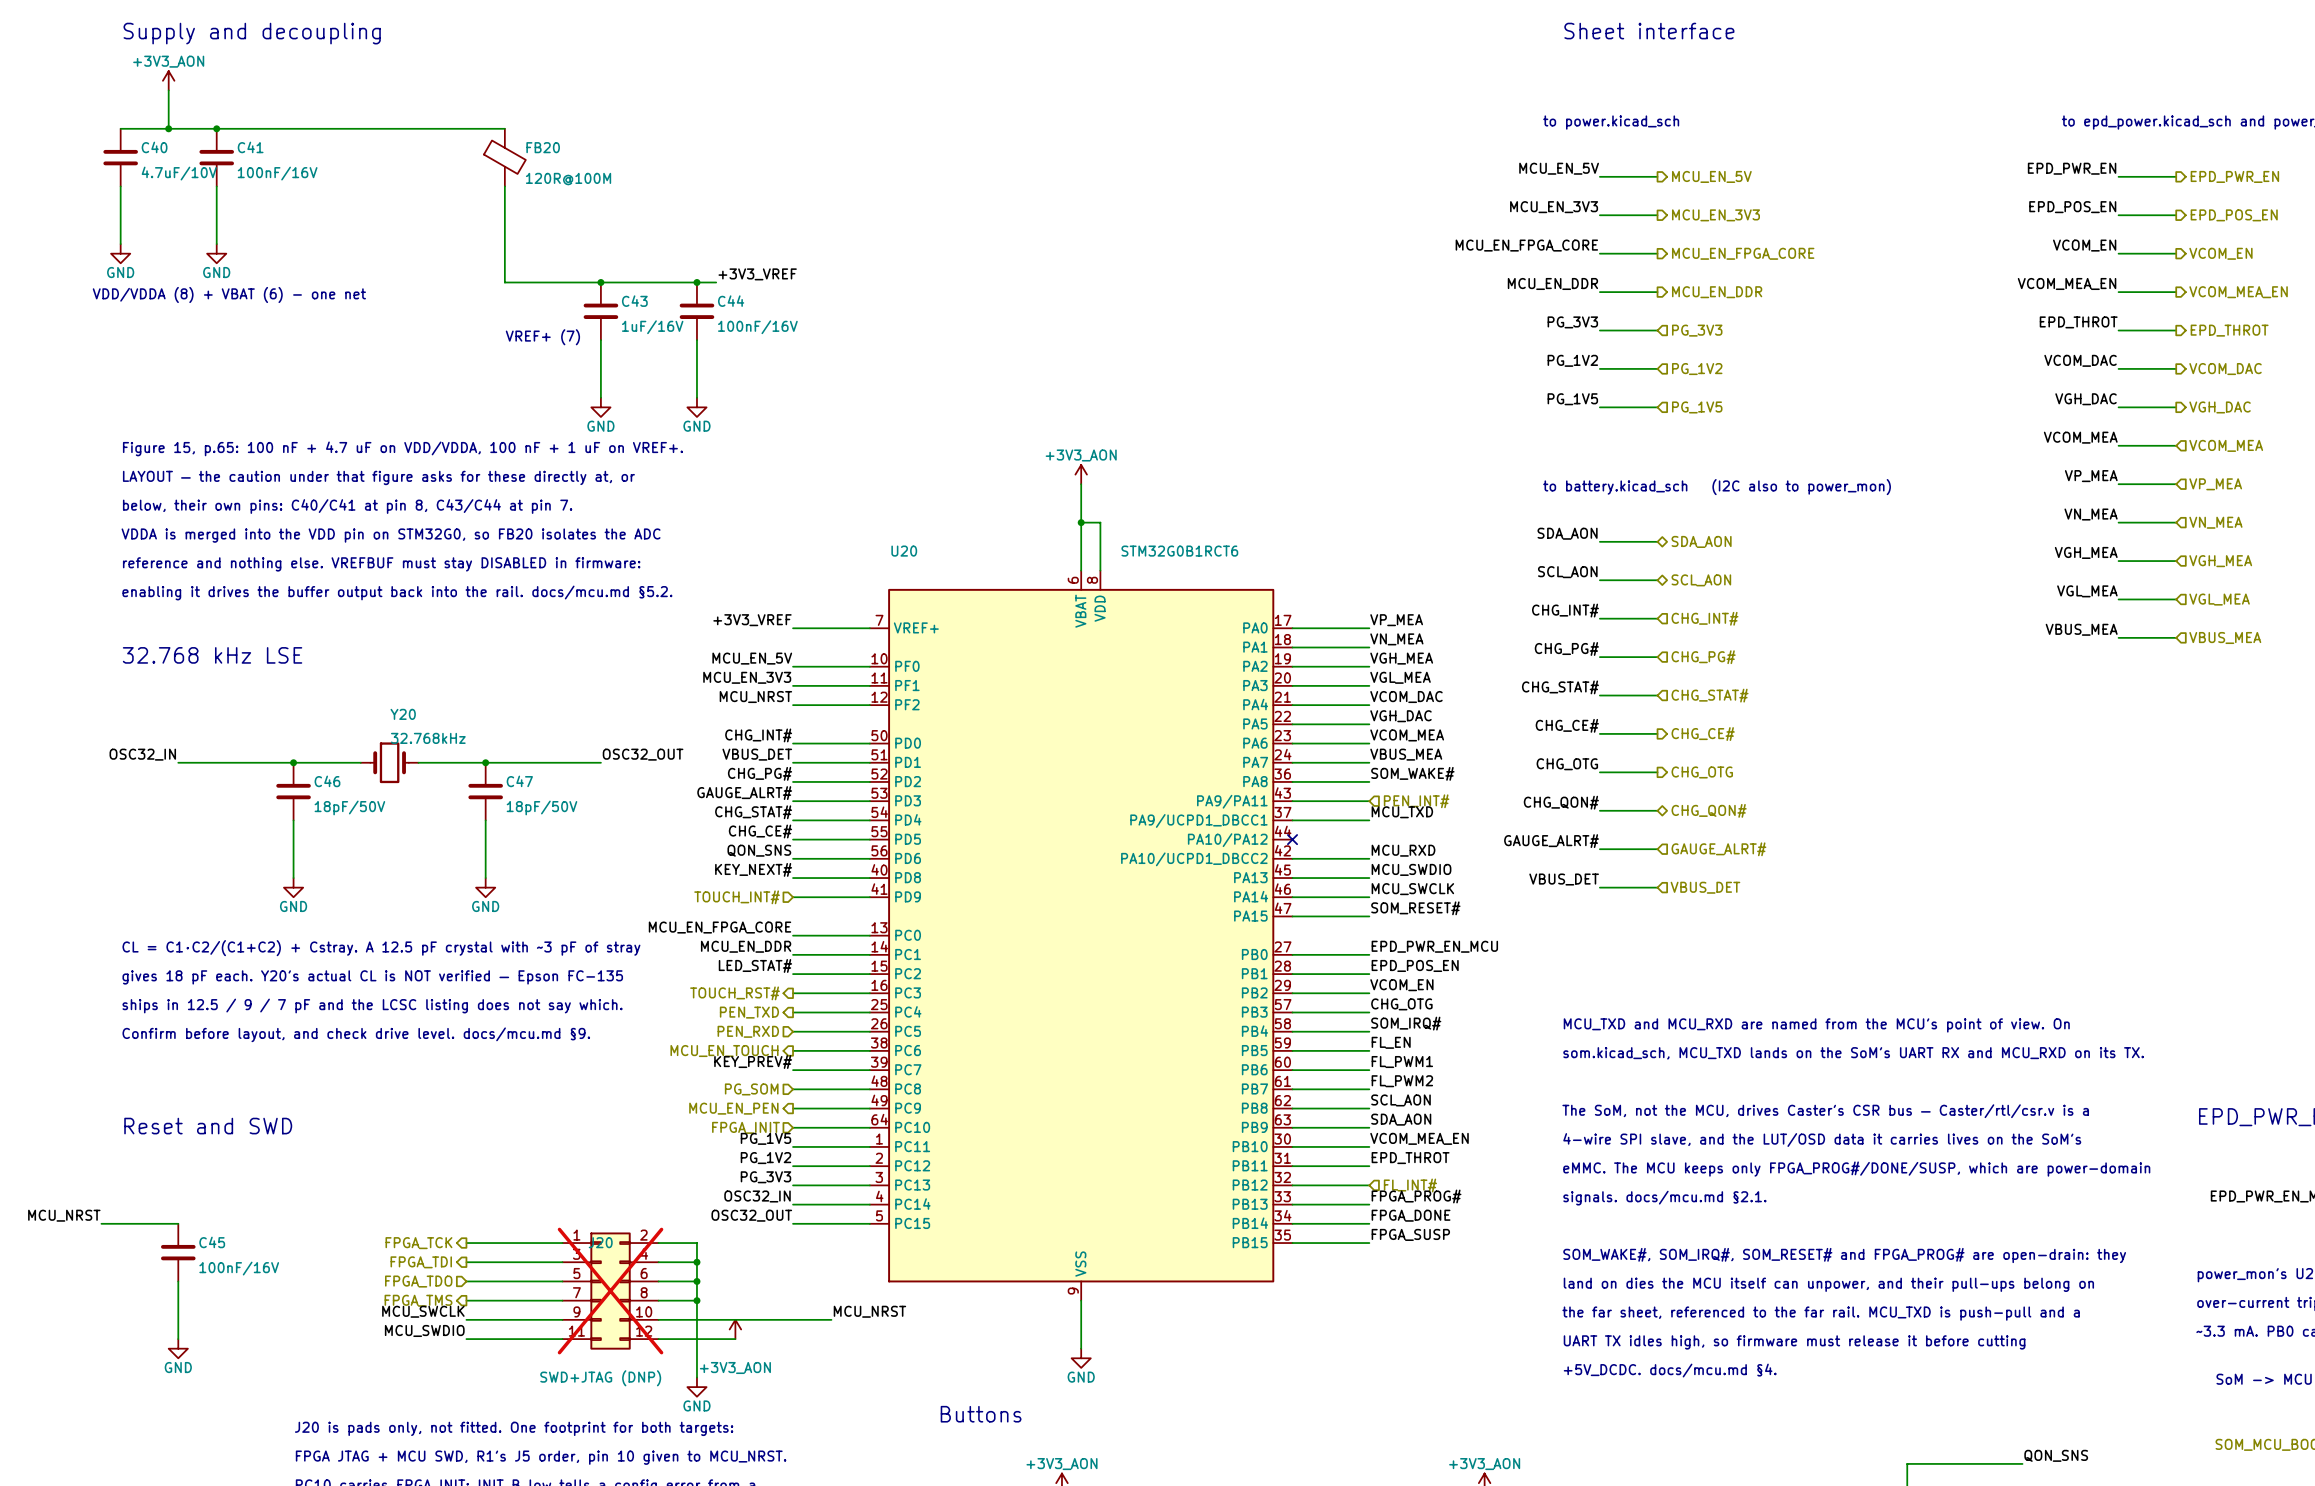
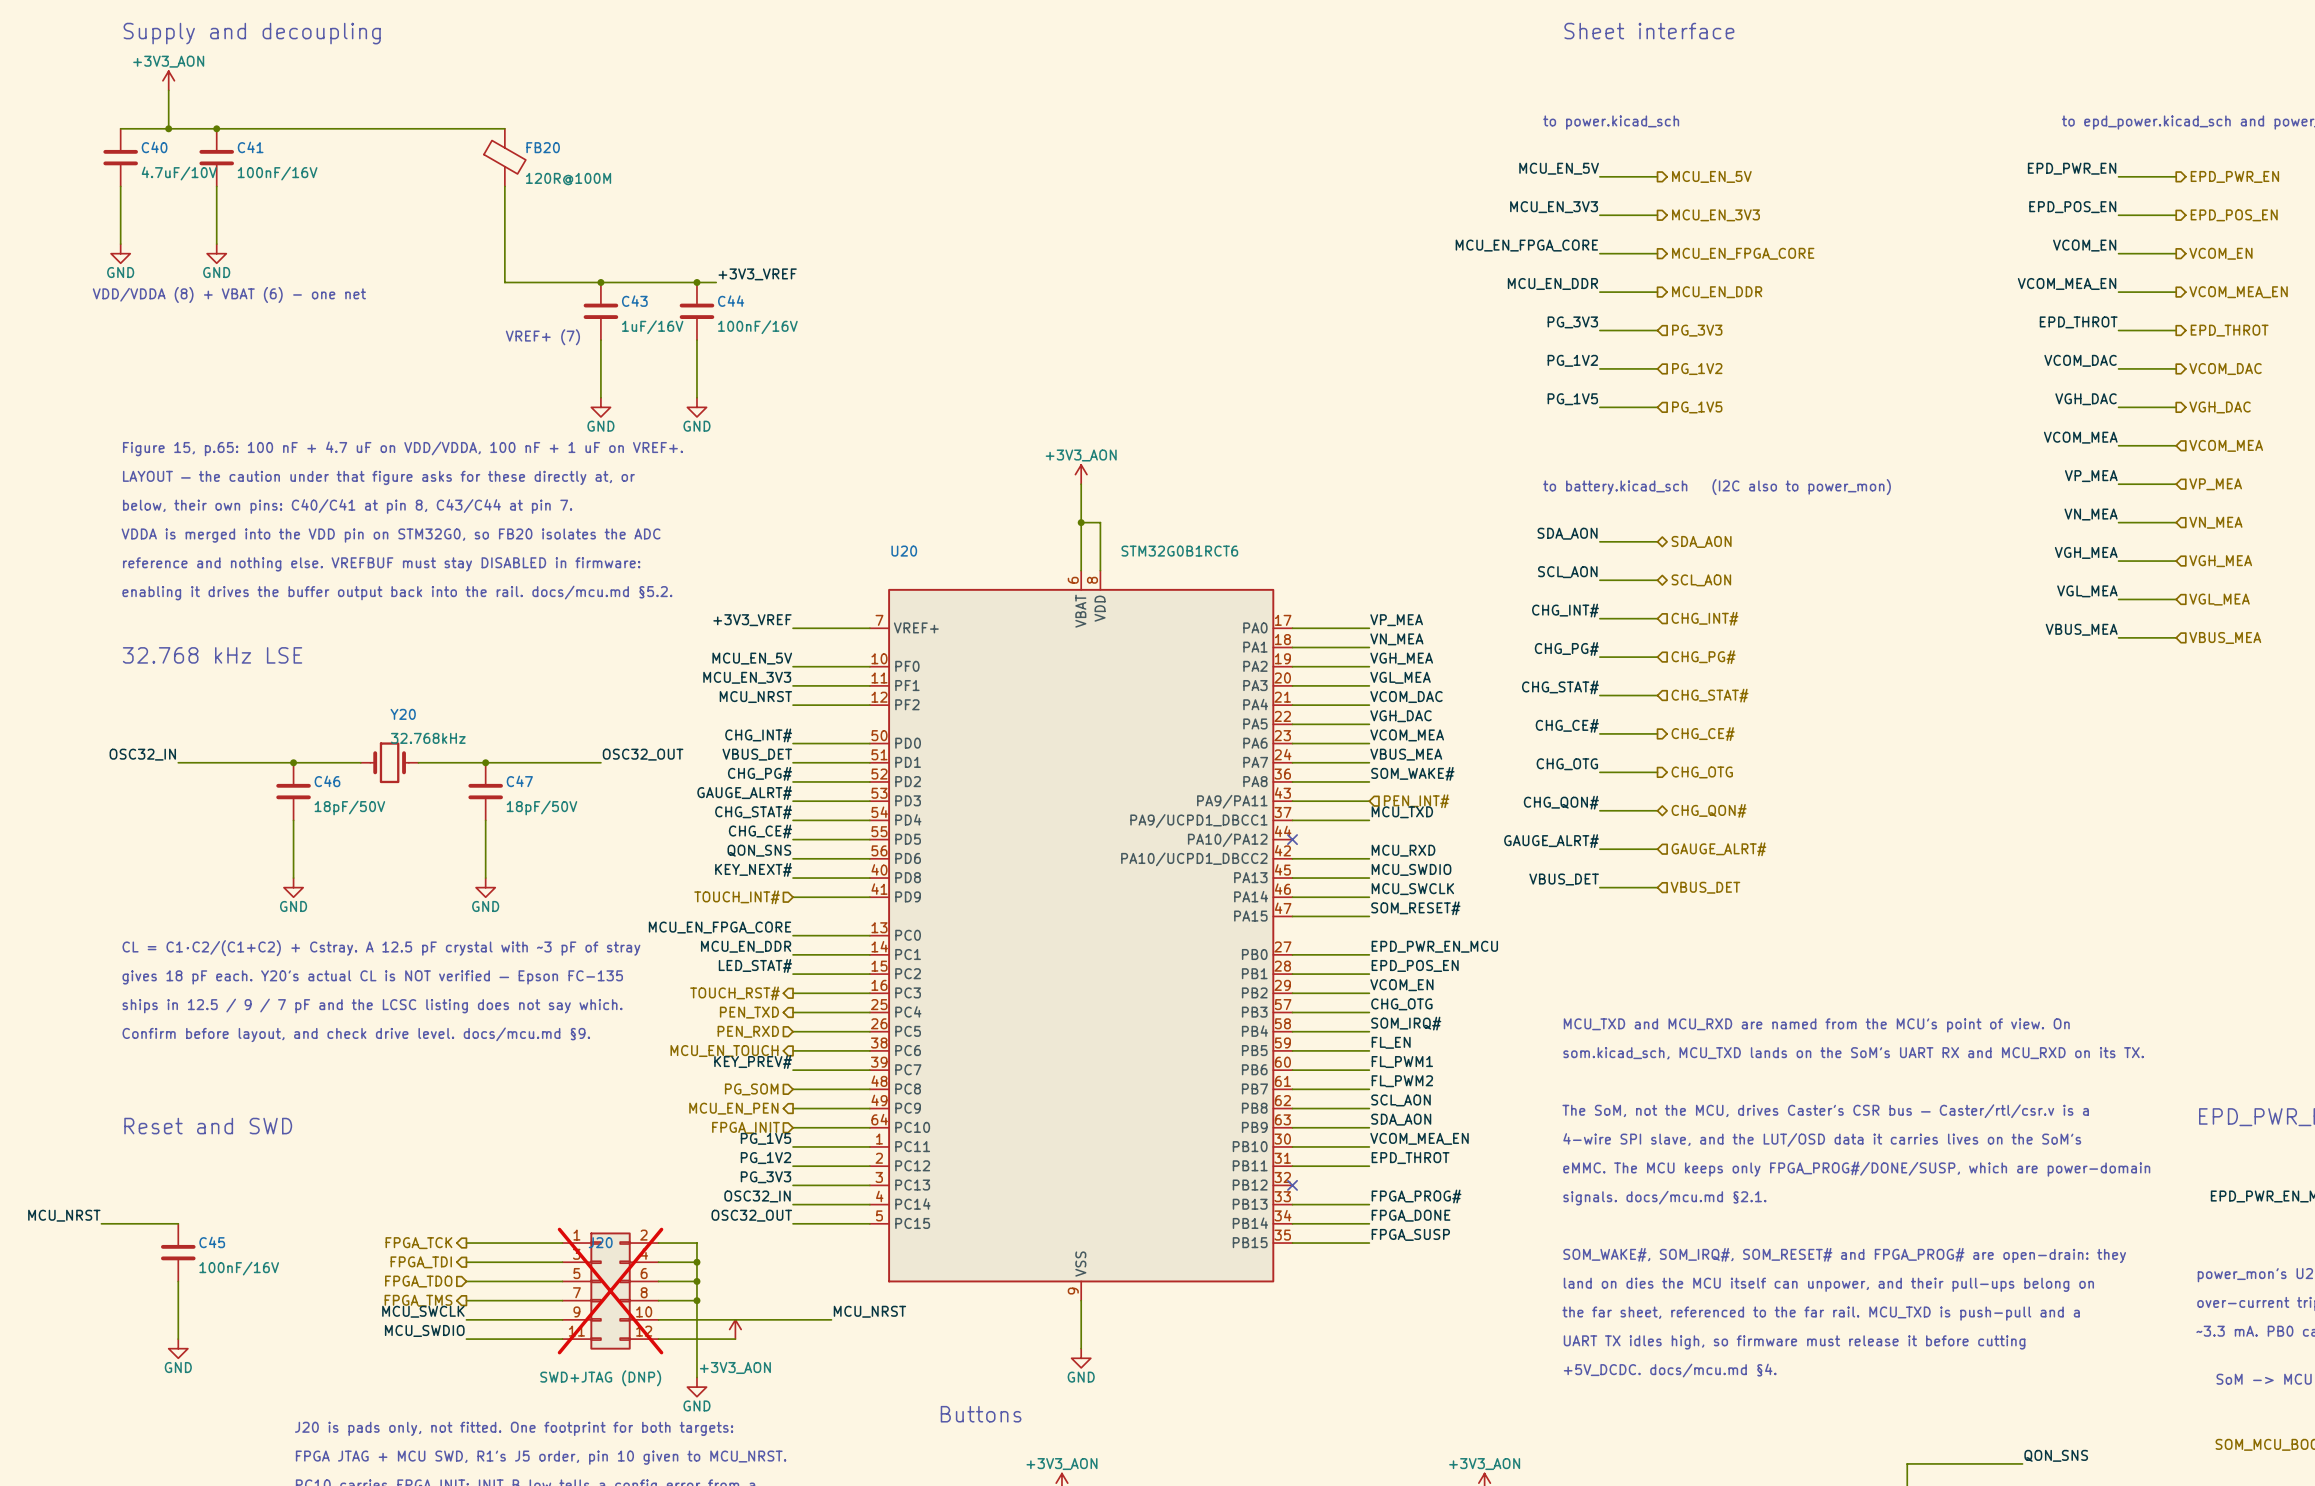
wire: (1292, 1185) (1369, 1185) -> none
no-connect mark: none -> (1292, 1185)
hierarchical label: FL_INT# (1410, 1185) -> none

